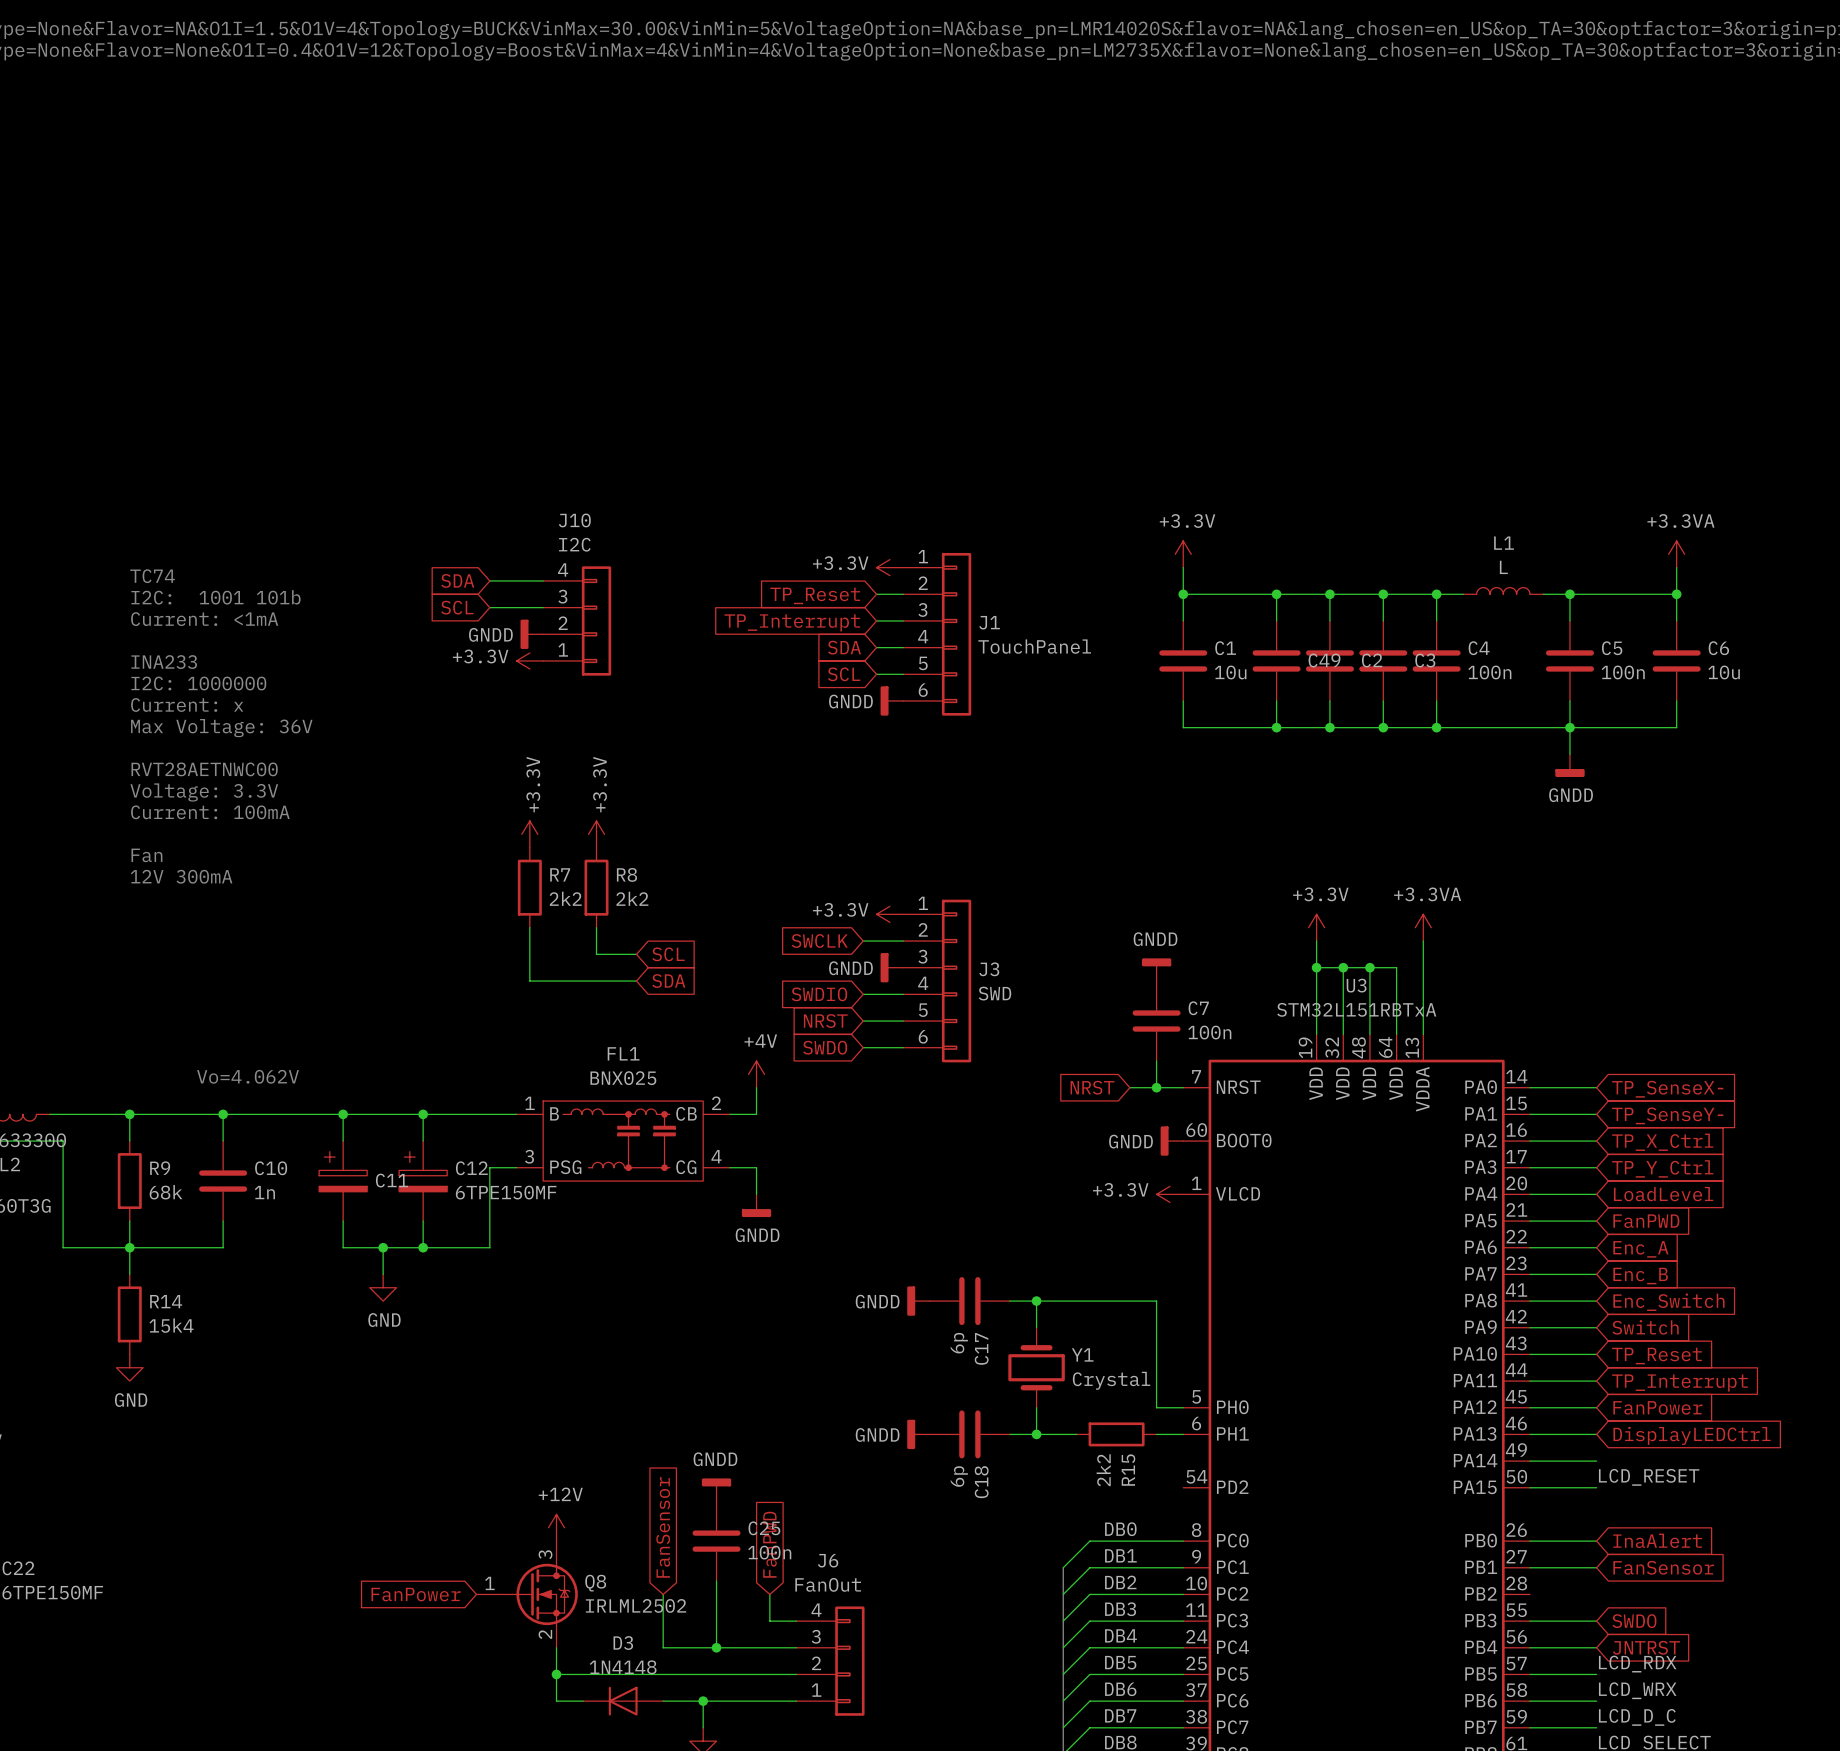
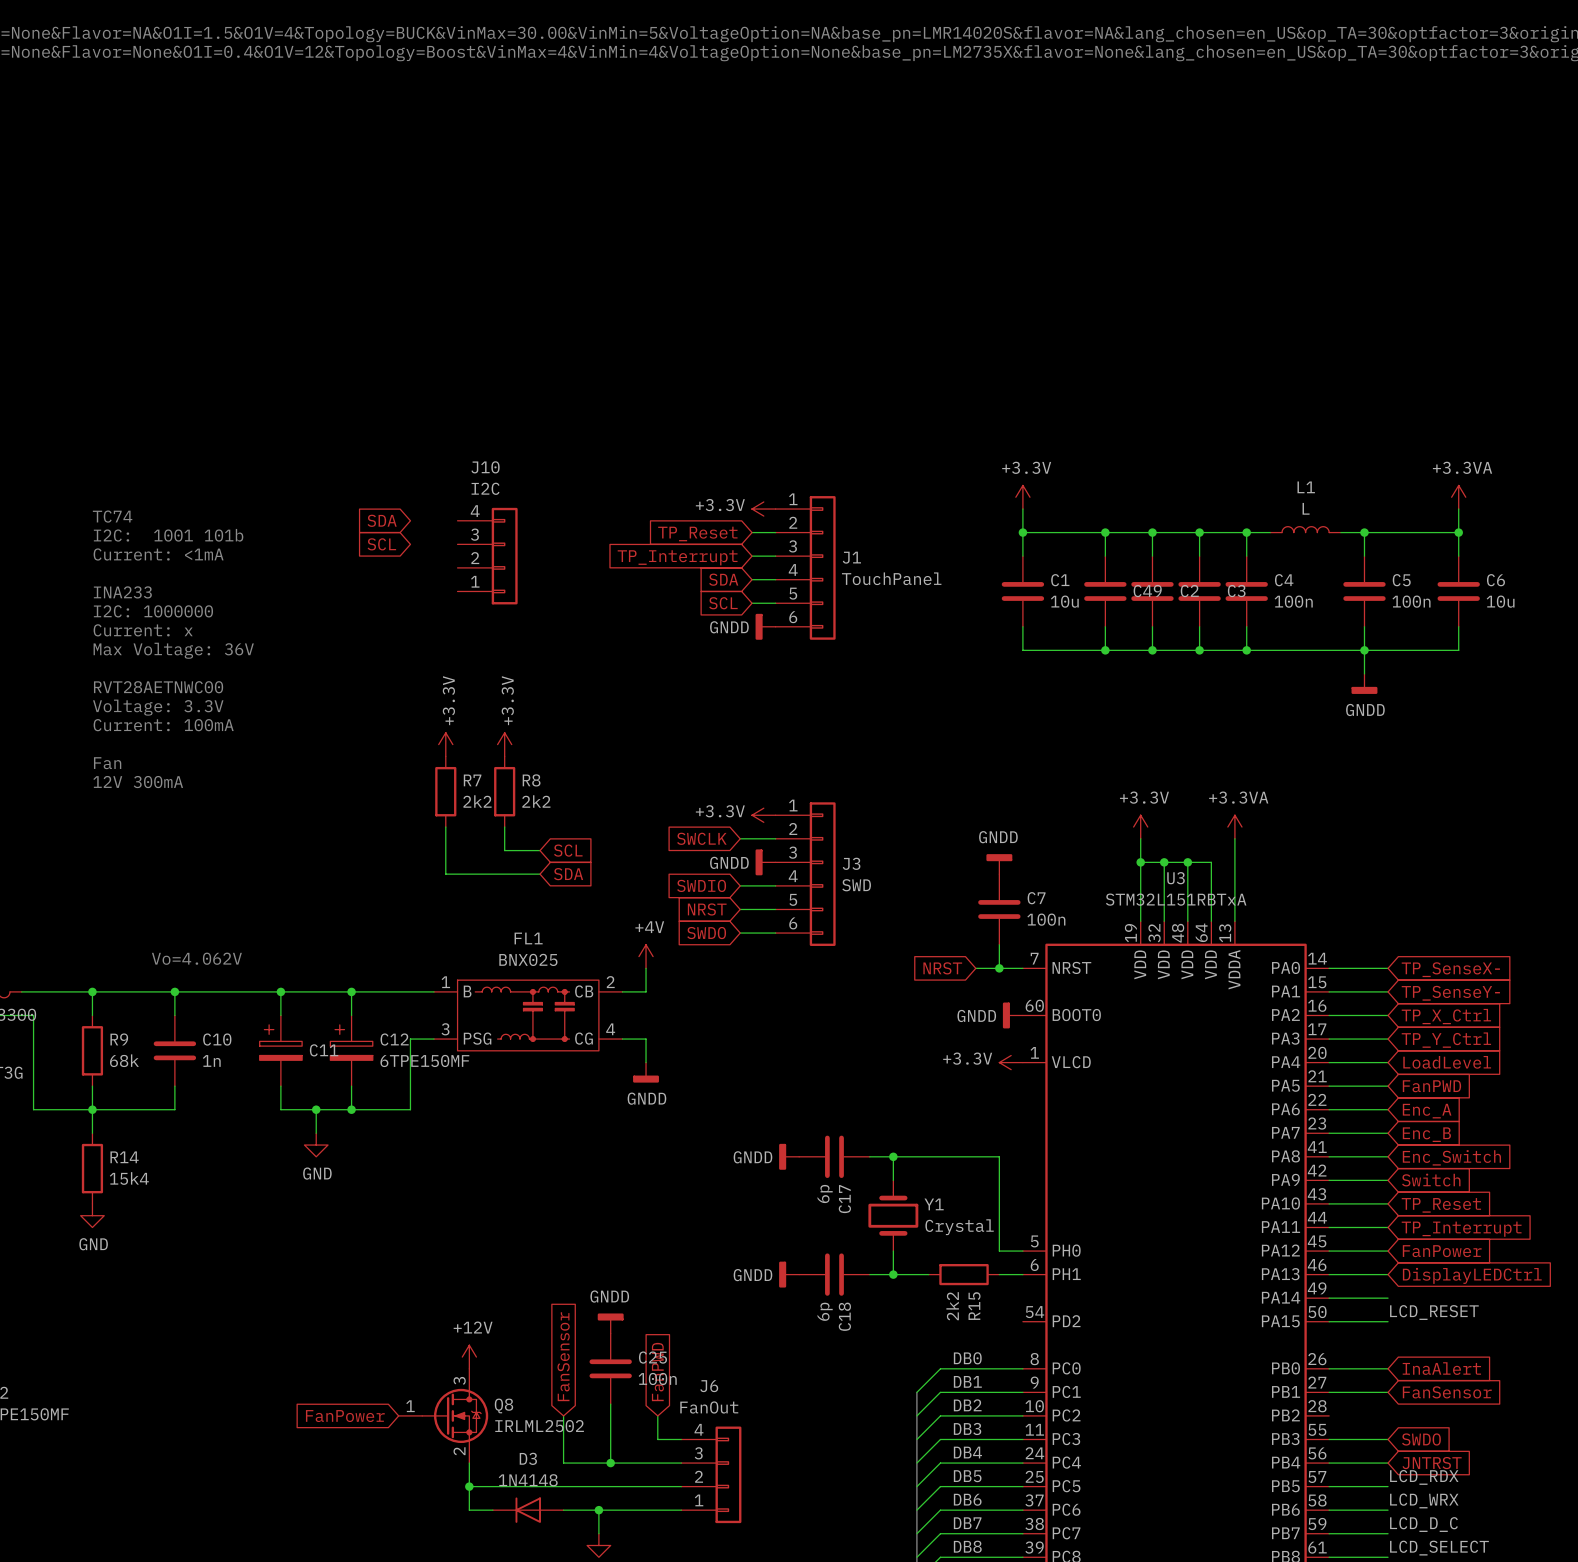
wire: (489, 580) (543, 580) -> none
wire: (489, 607) (543, 607) -> none
power symbol: GNDD (531, 634) -> none
power symbol: +3.3V (529, 660) -> none

